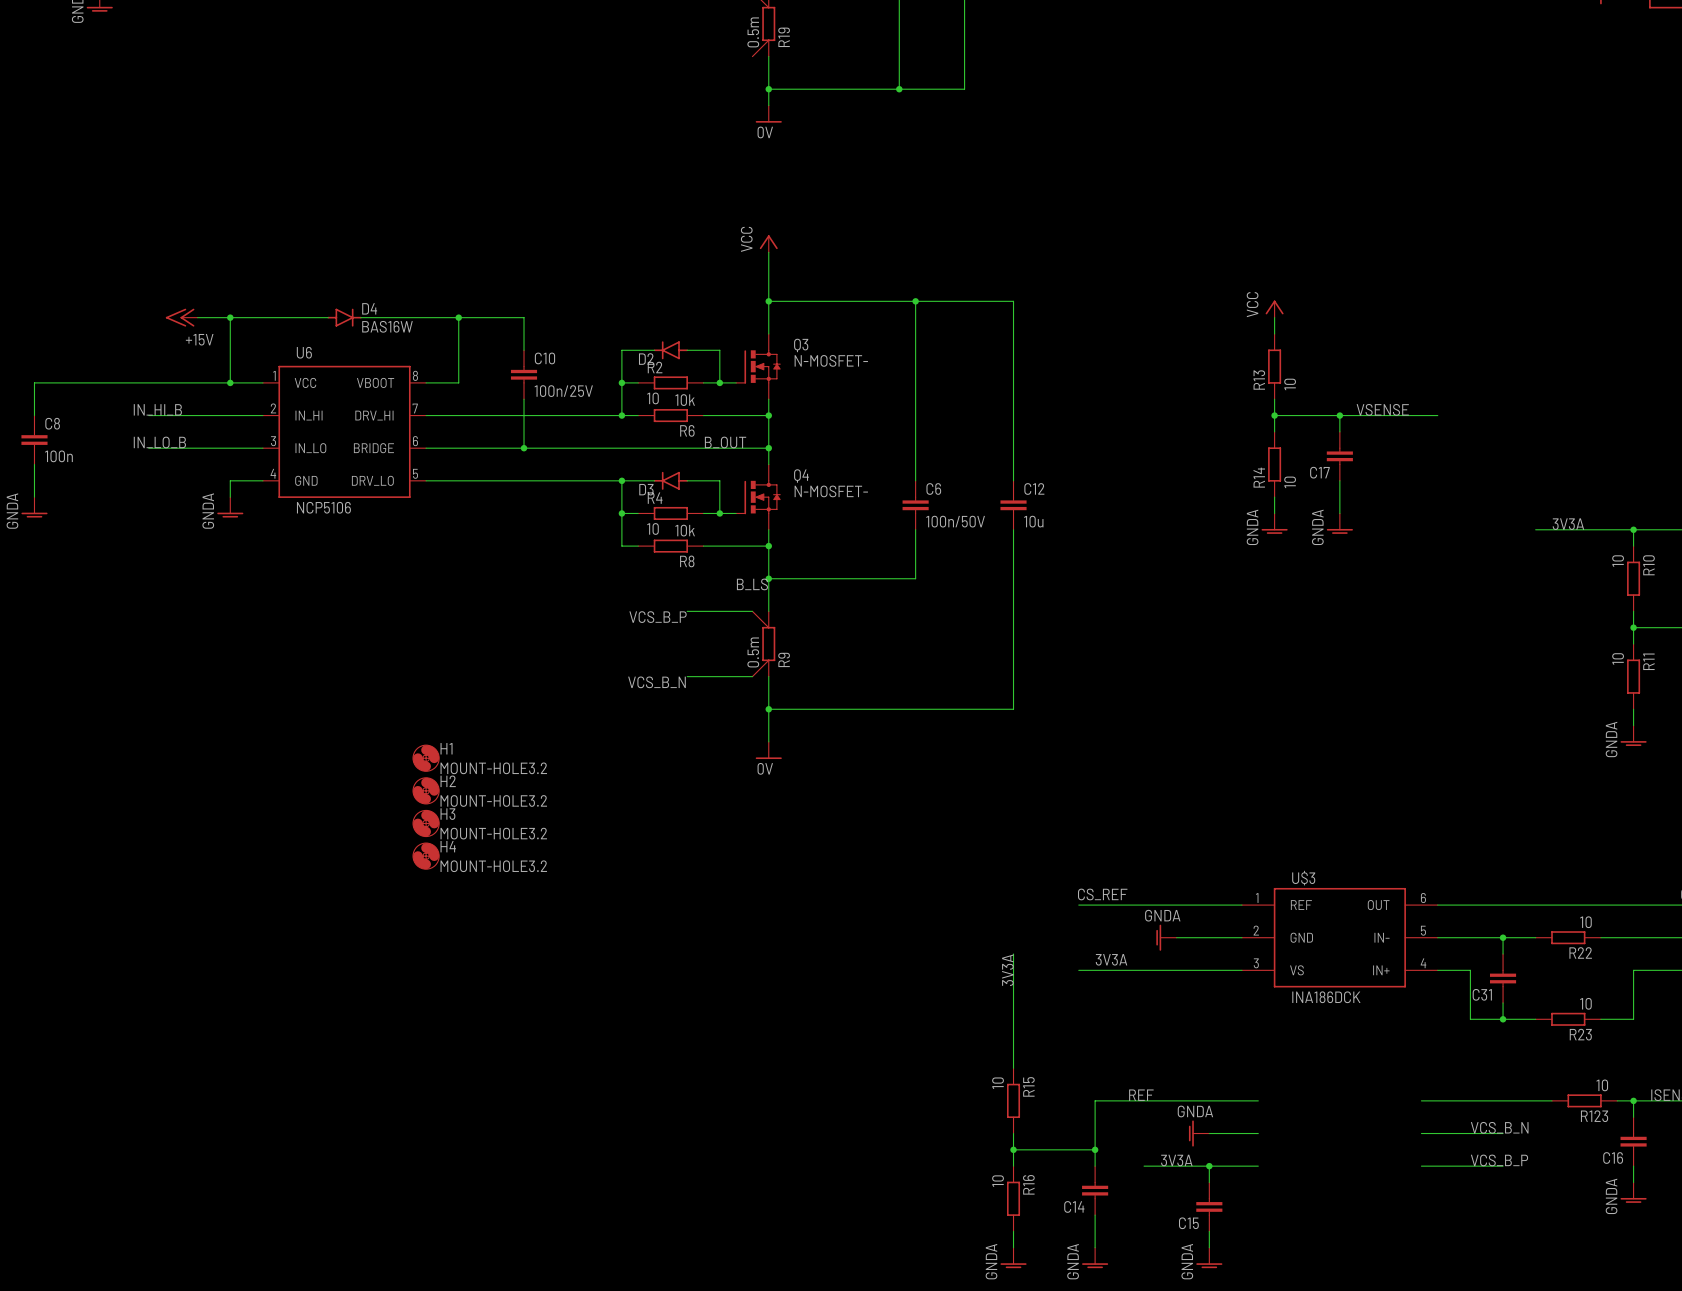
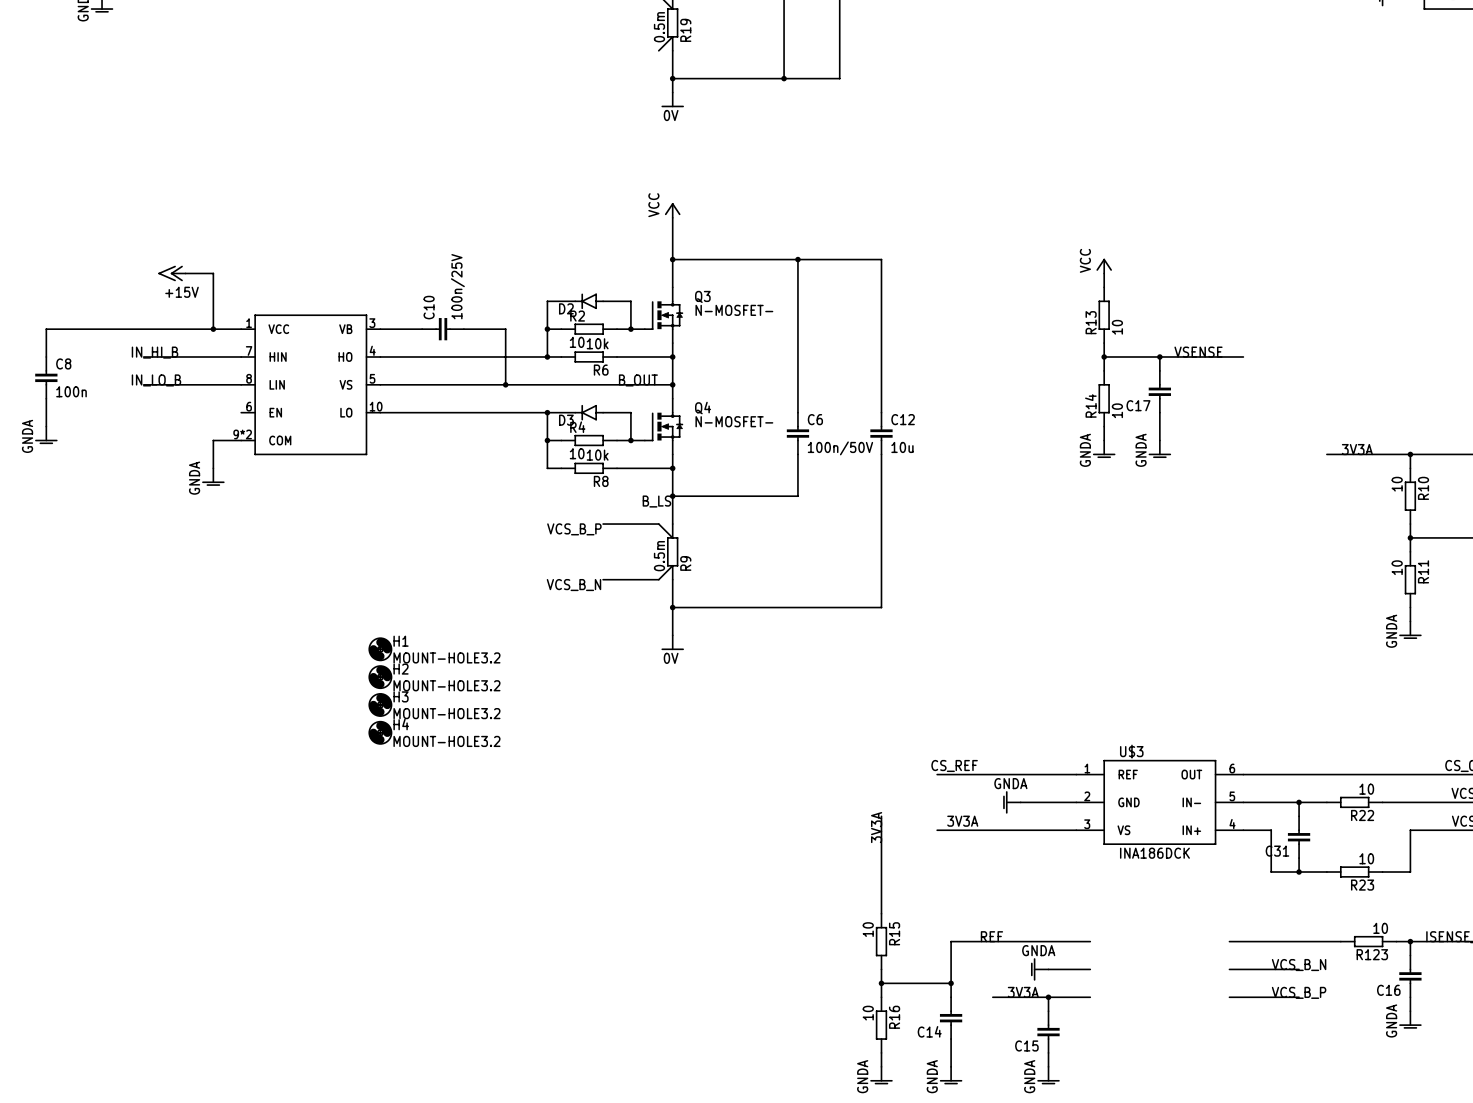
wire: (230, 317) (328, 317) -> none
junction: (230, 317) -> none
D4: BAS16W (344, 317) -> none
wire: (360, 317) (524, 317) (524, 350) -> none
wire: (458, 317) (458, 382) -> (422, 329) (408, 329)
junction: (458, 317) -> none
C10 name position: C10 (544, 358) -> C10 (429, 307)
C10 rotation: 0° (524, 374) -> 90° clockwise (443, 329)
wire: none -> (463, 329) (505, 329) (505, 384)
C10 value position: 100n/25V (563, 391) -> 100n/25V (457, 286)
wire: (524, 399) (524, 448) -> none
U6: NCP5106 (344, 431) -> none
part: none -> (310, 384)
junction: (524, 448) -> none
junction: none -> (505, 384)
wire: (262, 480) (230, 480) (230, 497) -> none
power symbol position: GNDA (230, 507) -> GNDA (213, 477)
wire: none -> (241, 440) (213, 440) (213, 468)

